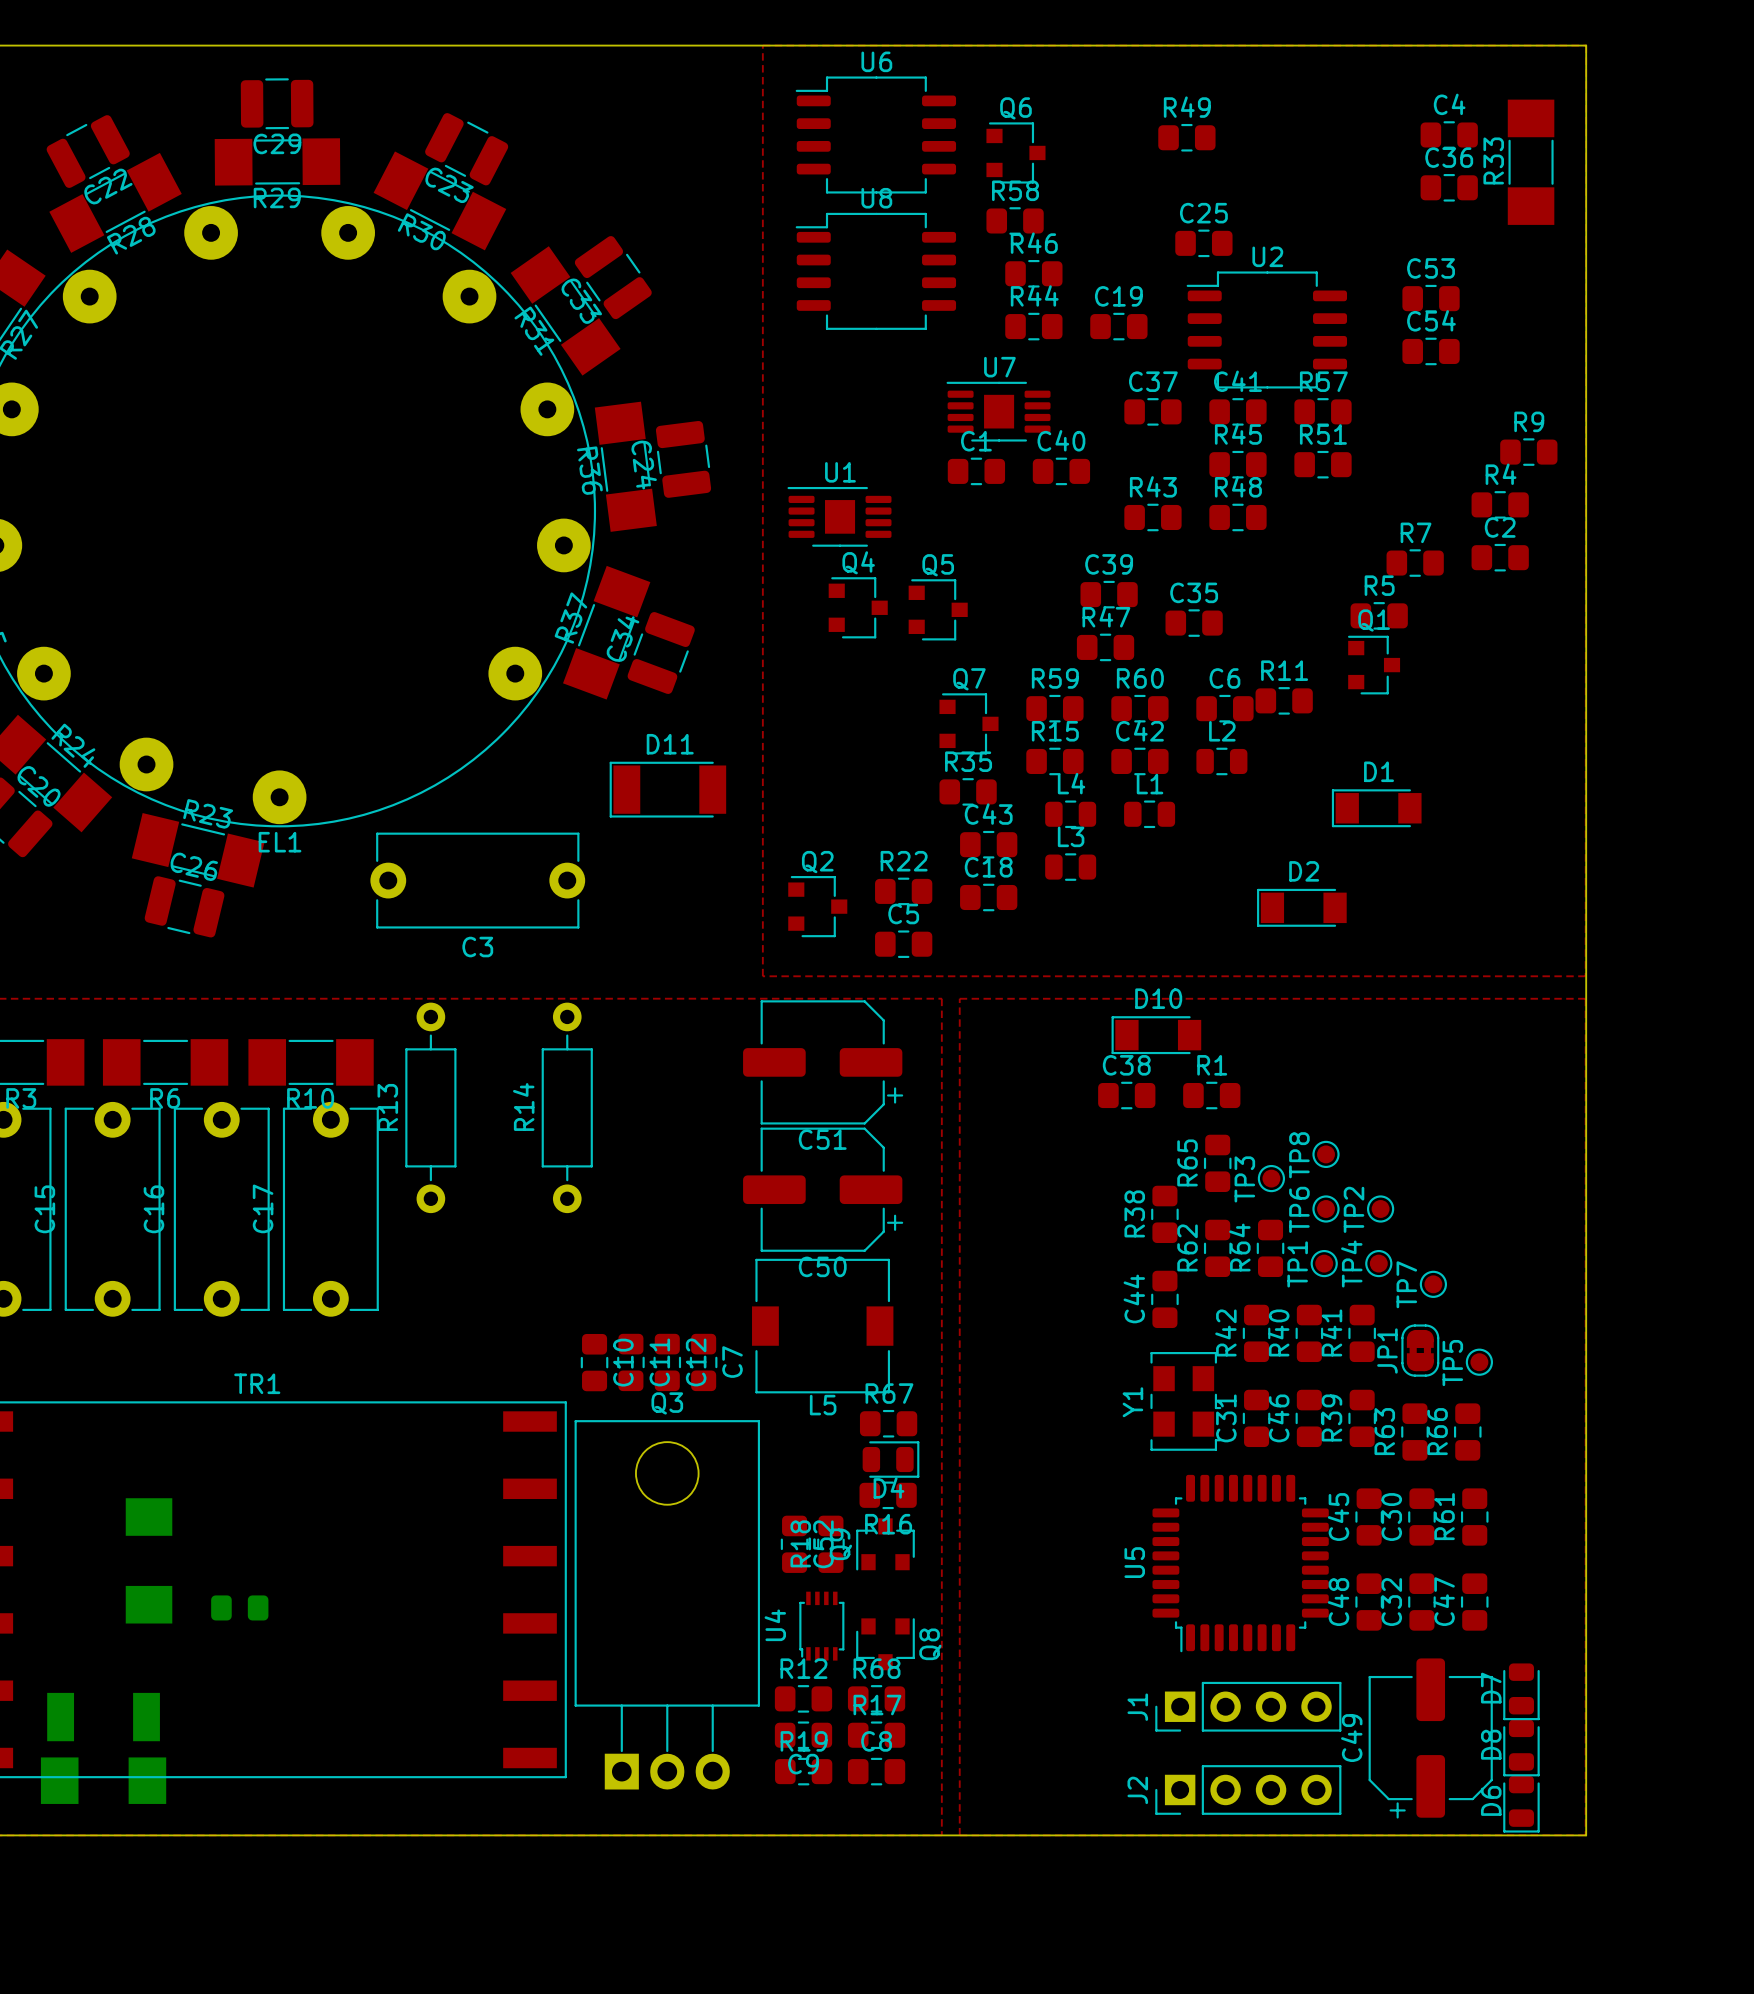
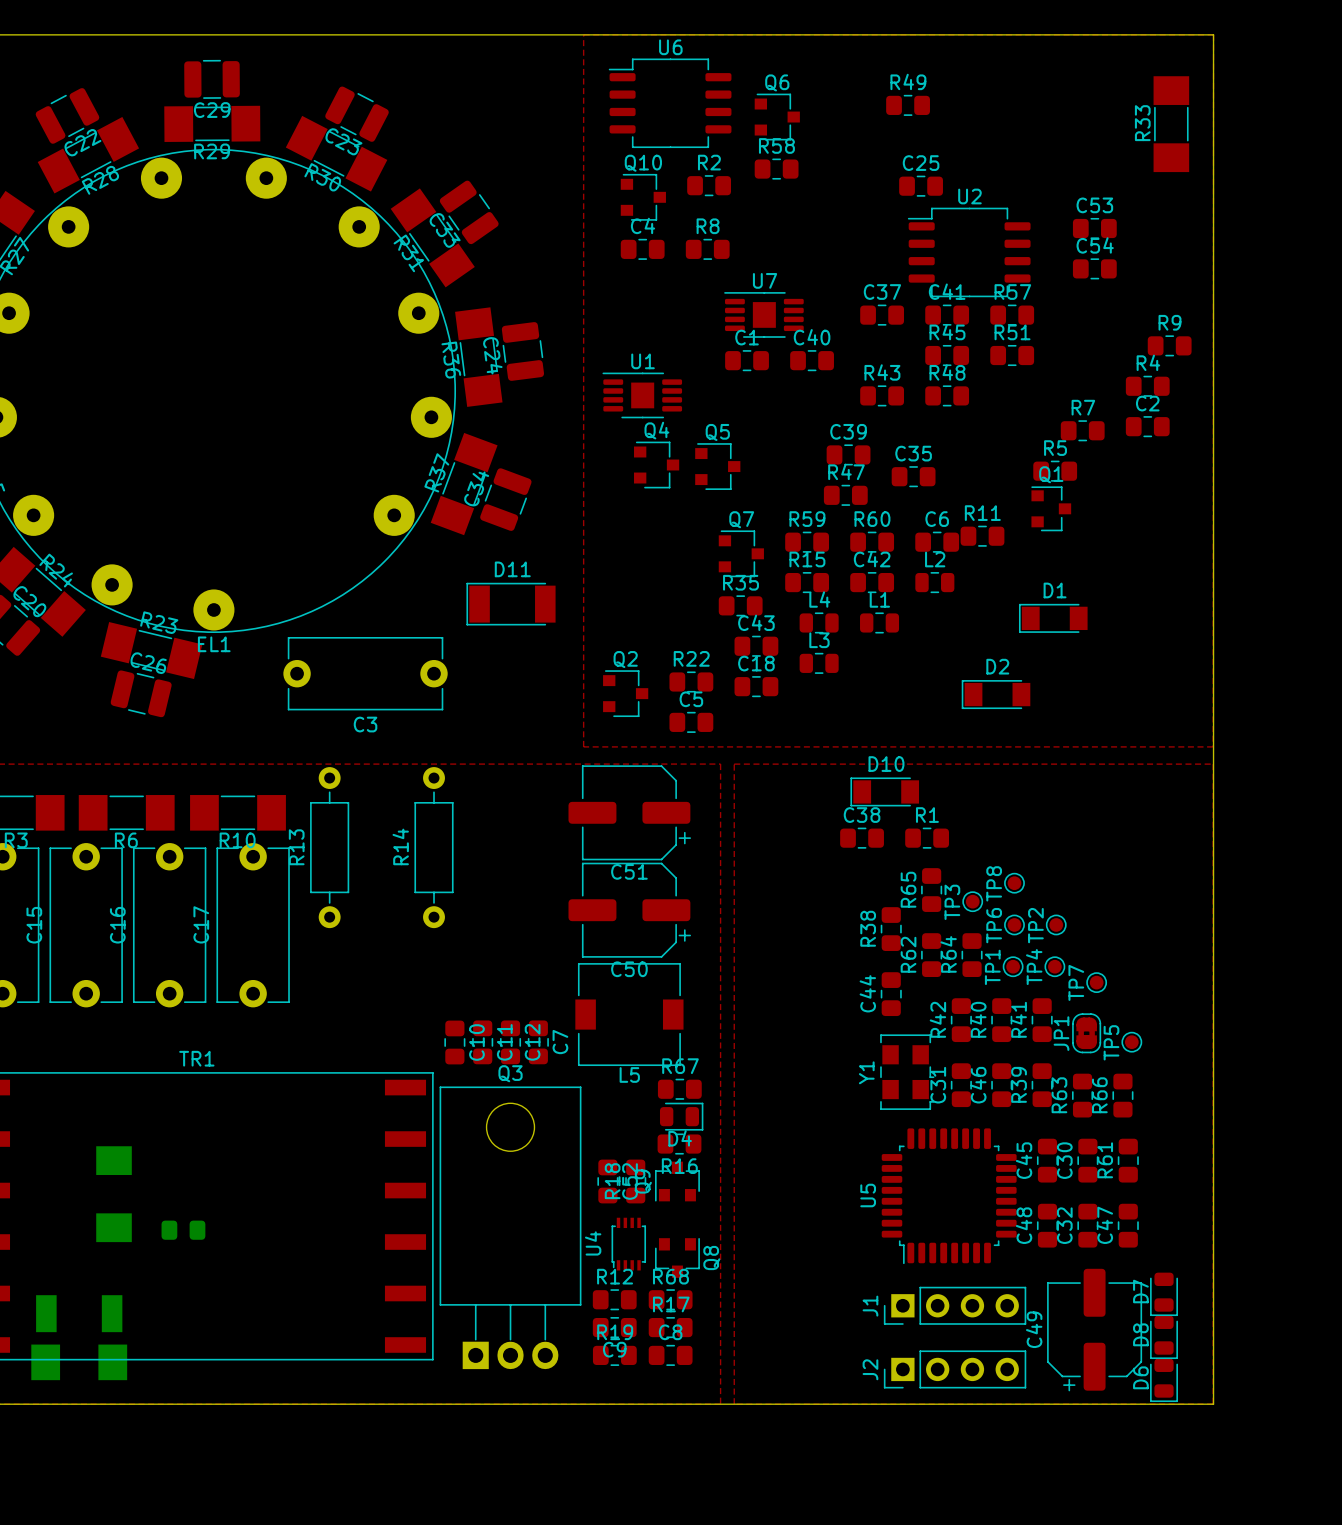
C4 position: (1449, 134) -> (642, 249)
C36: (1449, 187) -> none
R2: none -> (709, 185)
Q10: none -> (643, 197)
U8: (875, 271) -> none
R46: (1033, 273) -> none
R8: none -> (707, 249)
R44: (1033, 326) -> none
C19: (1118, 326) -> none

